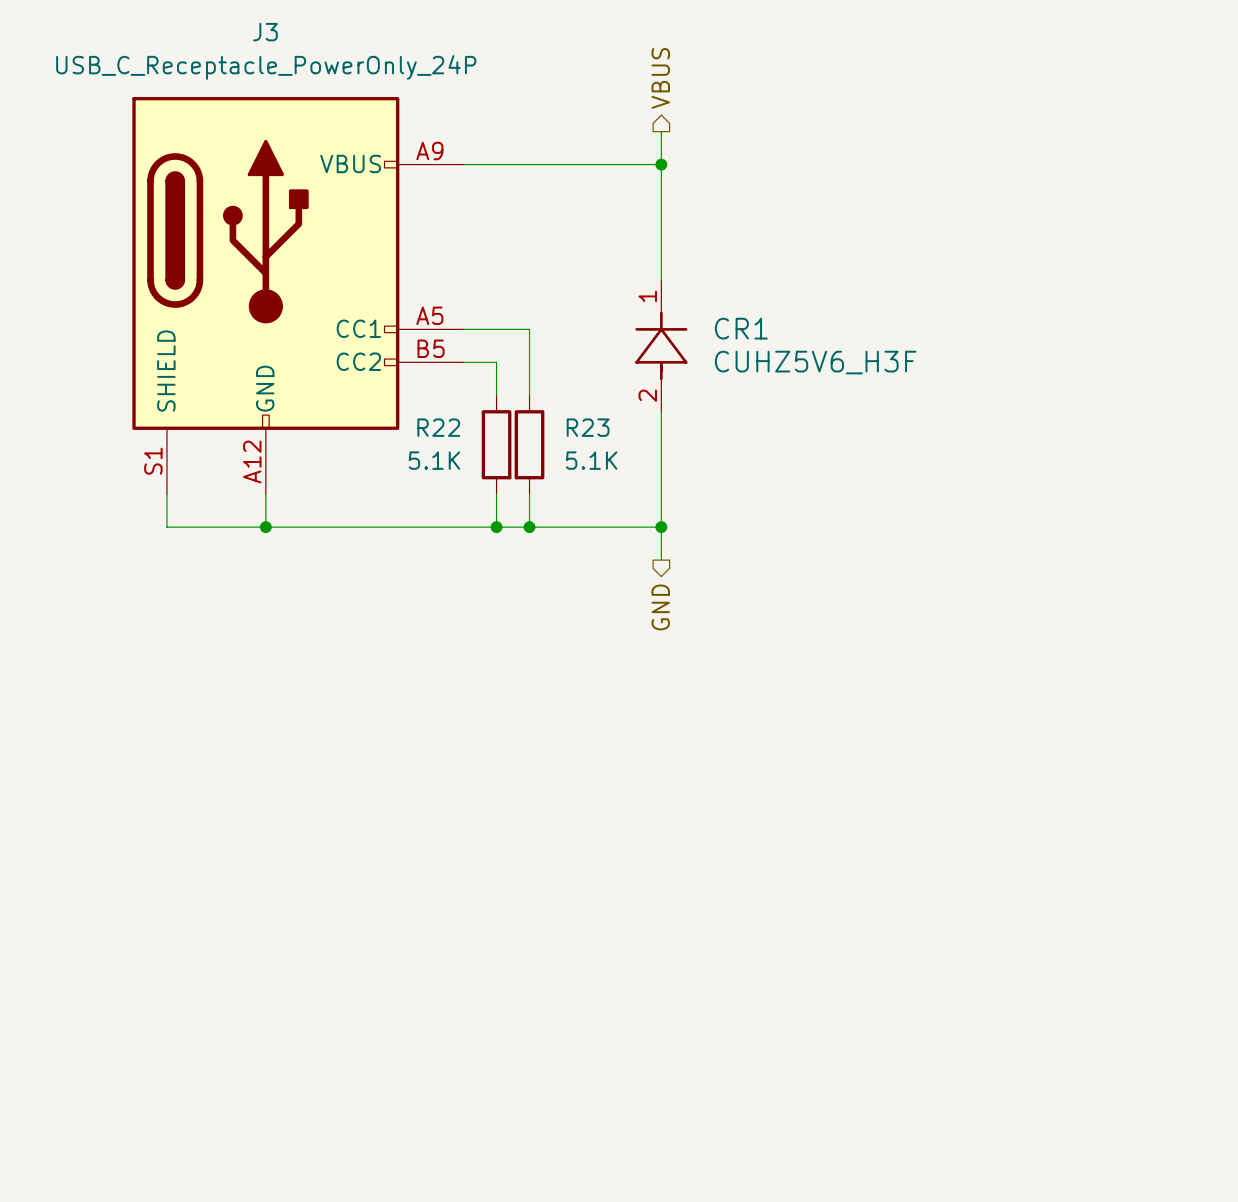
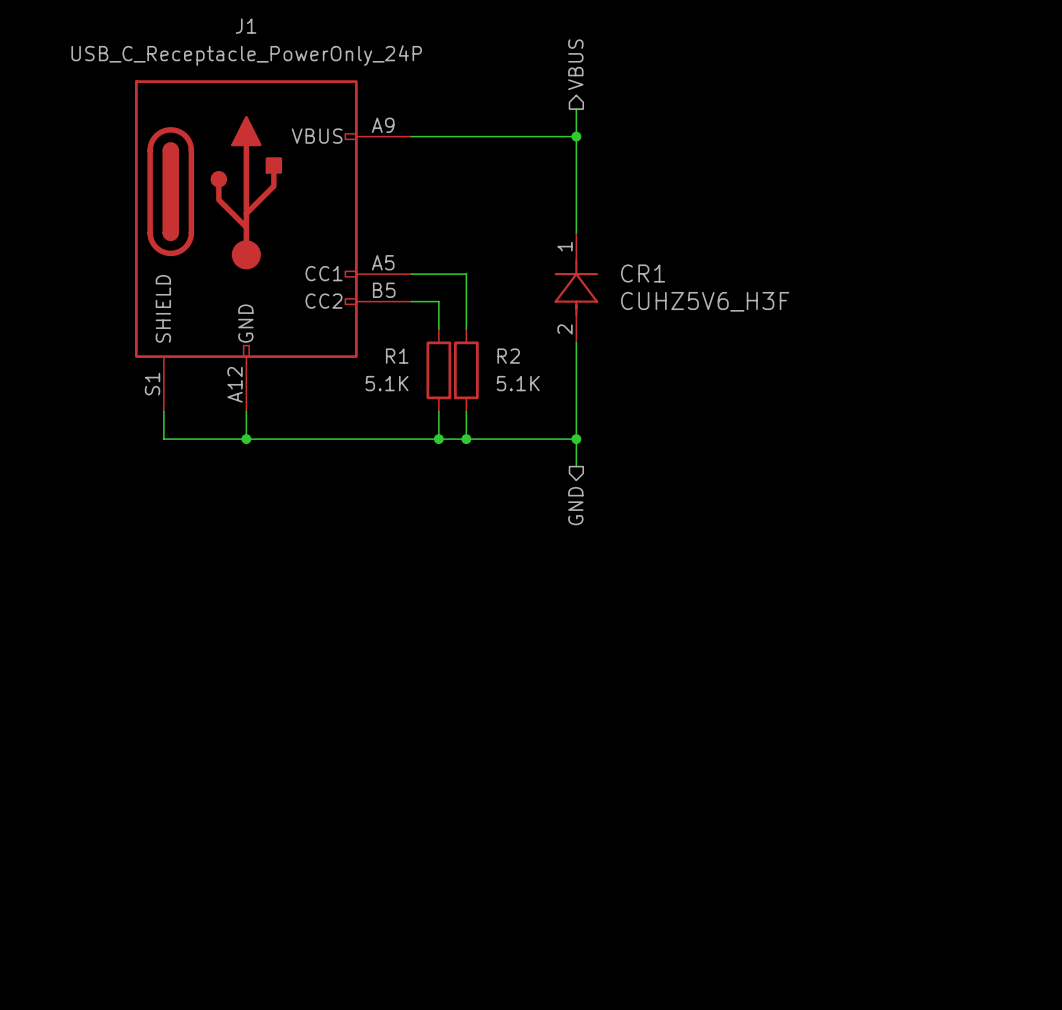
J3 name: J3 (265, 32) -> J1 (246, 26)
R22 name: R22 (438, 427) -> R1 (397, 356)
R23 name: R23 (588, 427) -> R2 (508, 356)

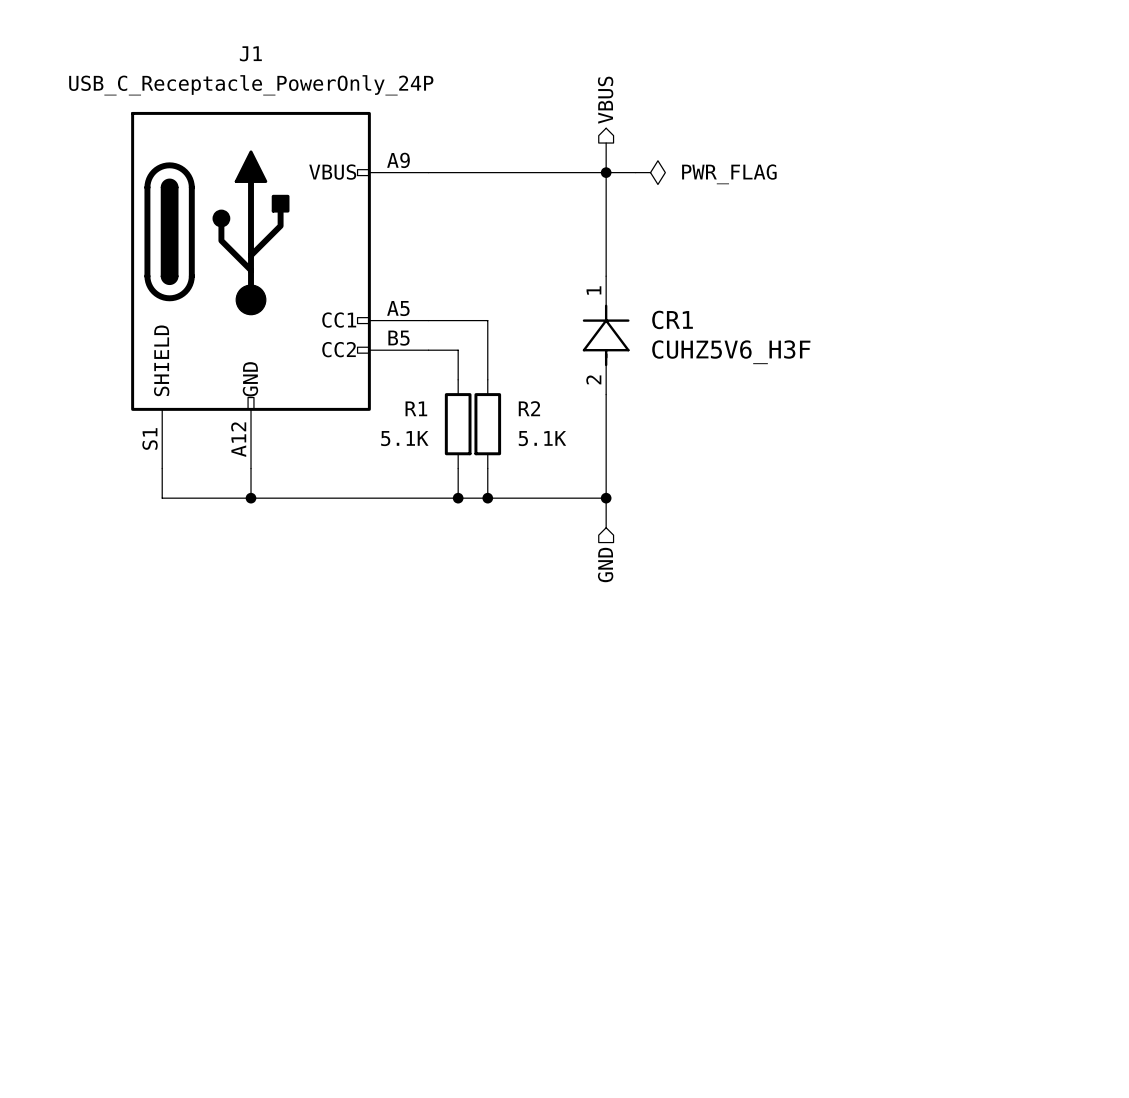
wire: none -> (606, 172) (635, 172)
power symbol: none -> PWR_FLAG (650, 172)
hierarchical label shape: output (575, 506) -> input (605, 565)

